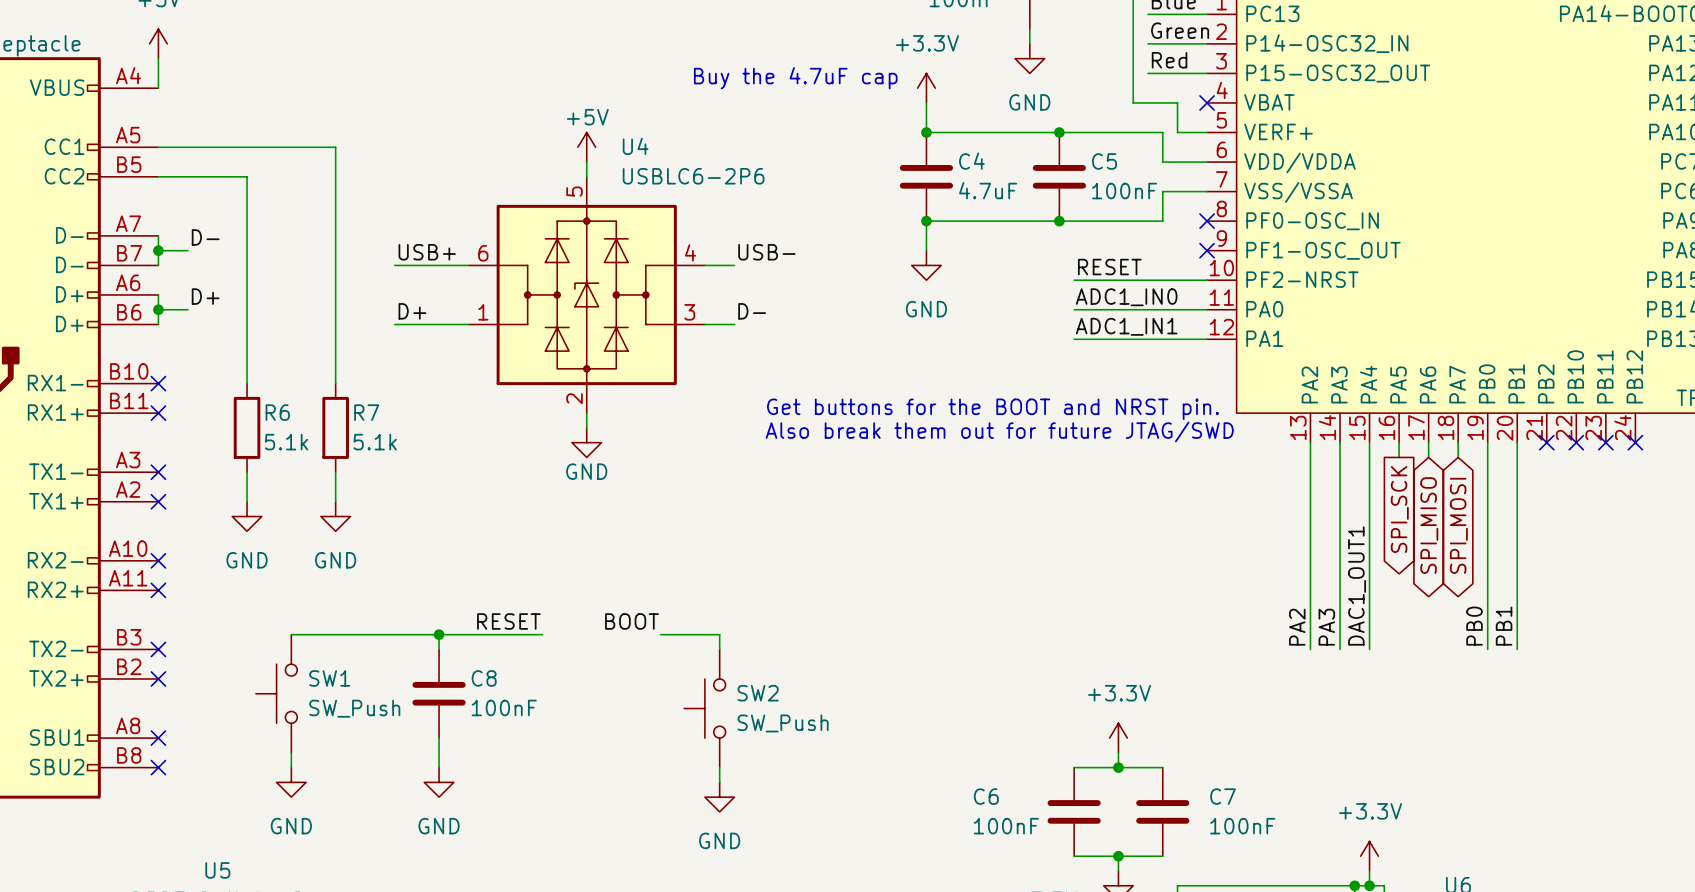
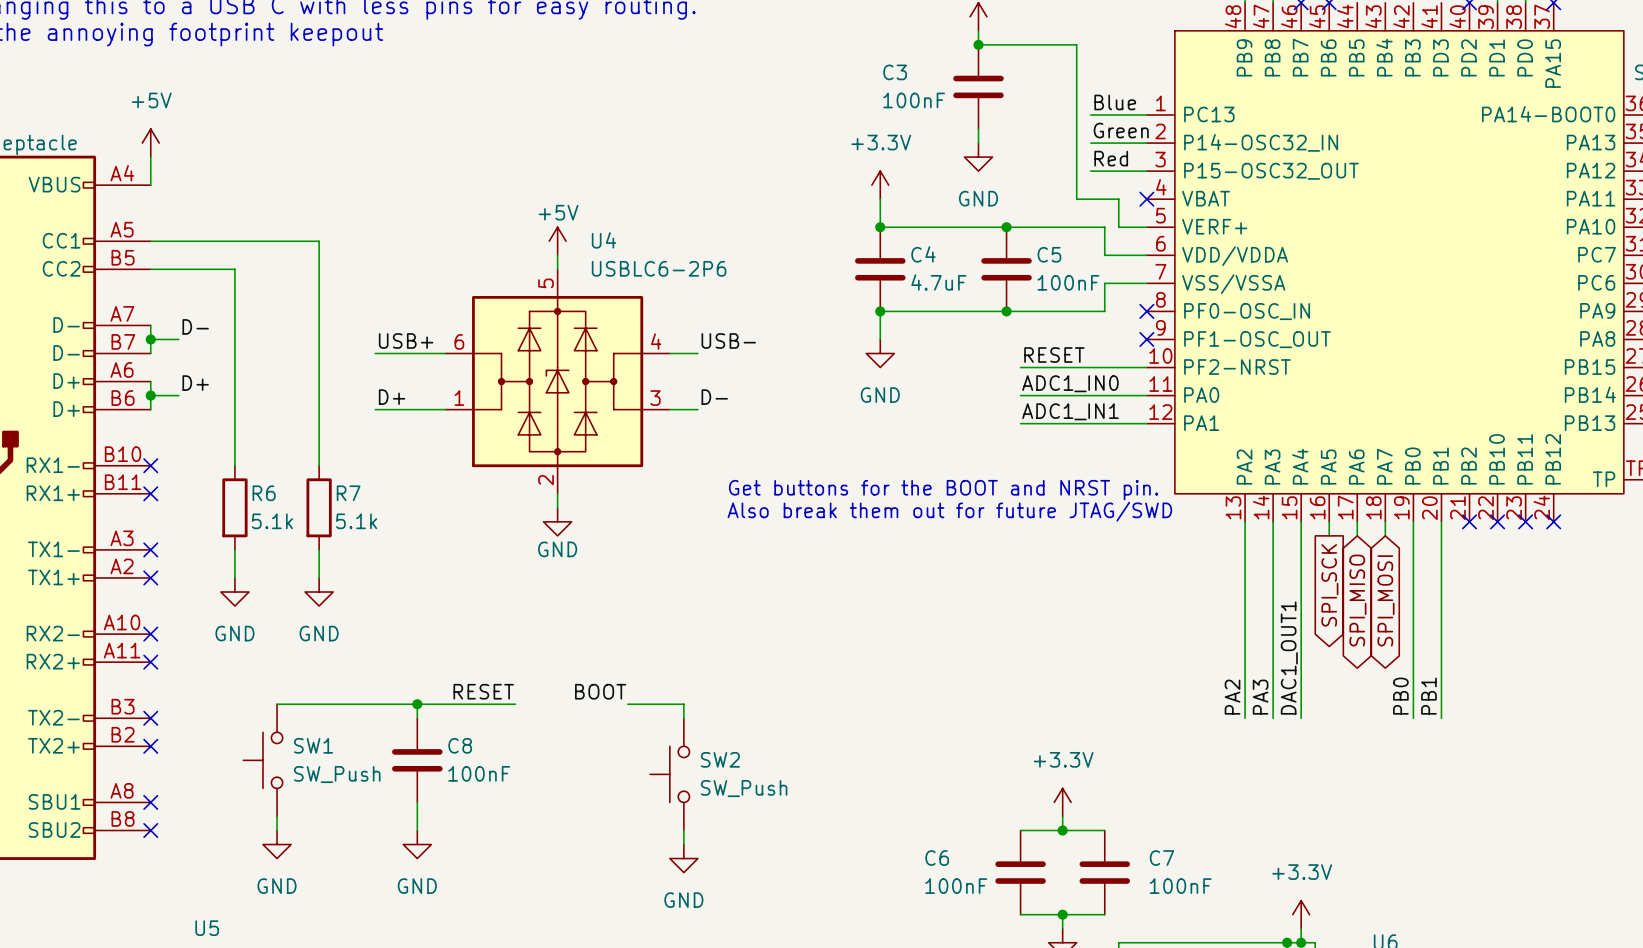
text: Buy the 4.7uF cap (795, 78) -> none

